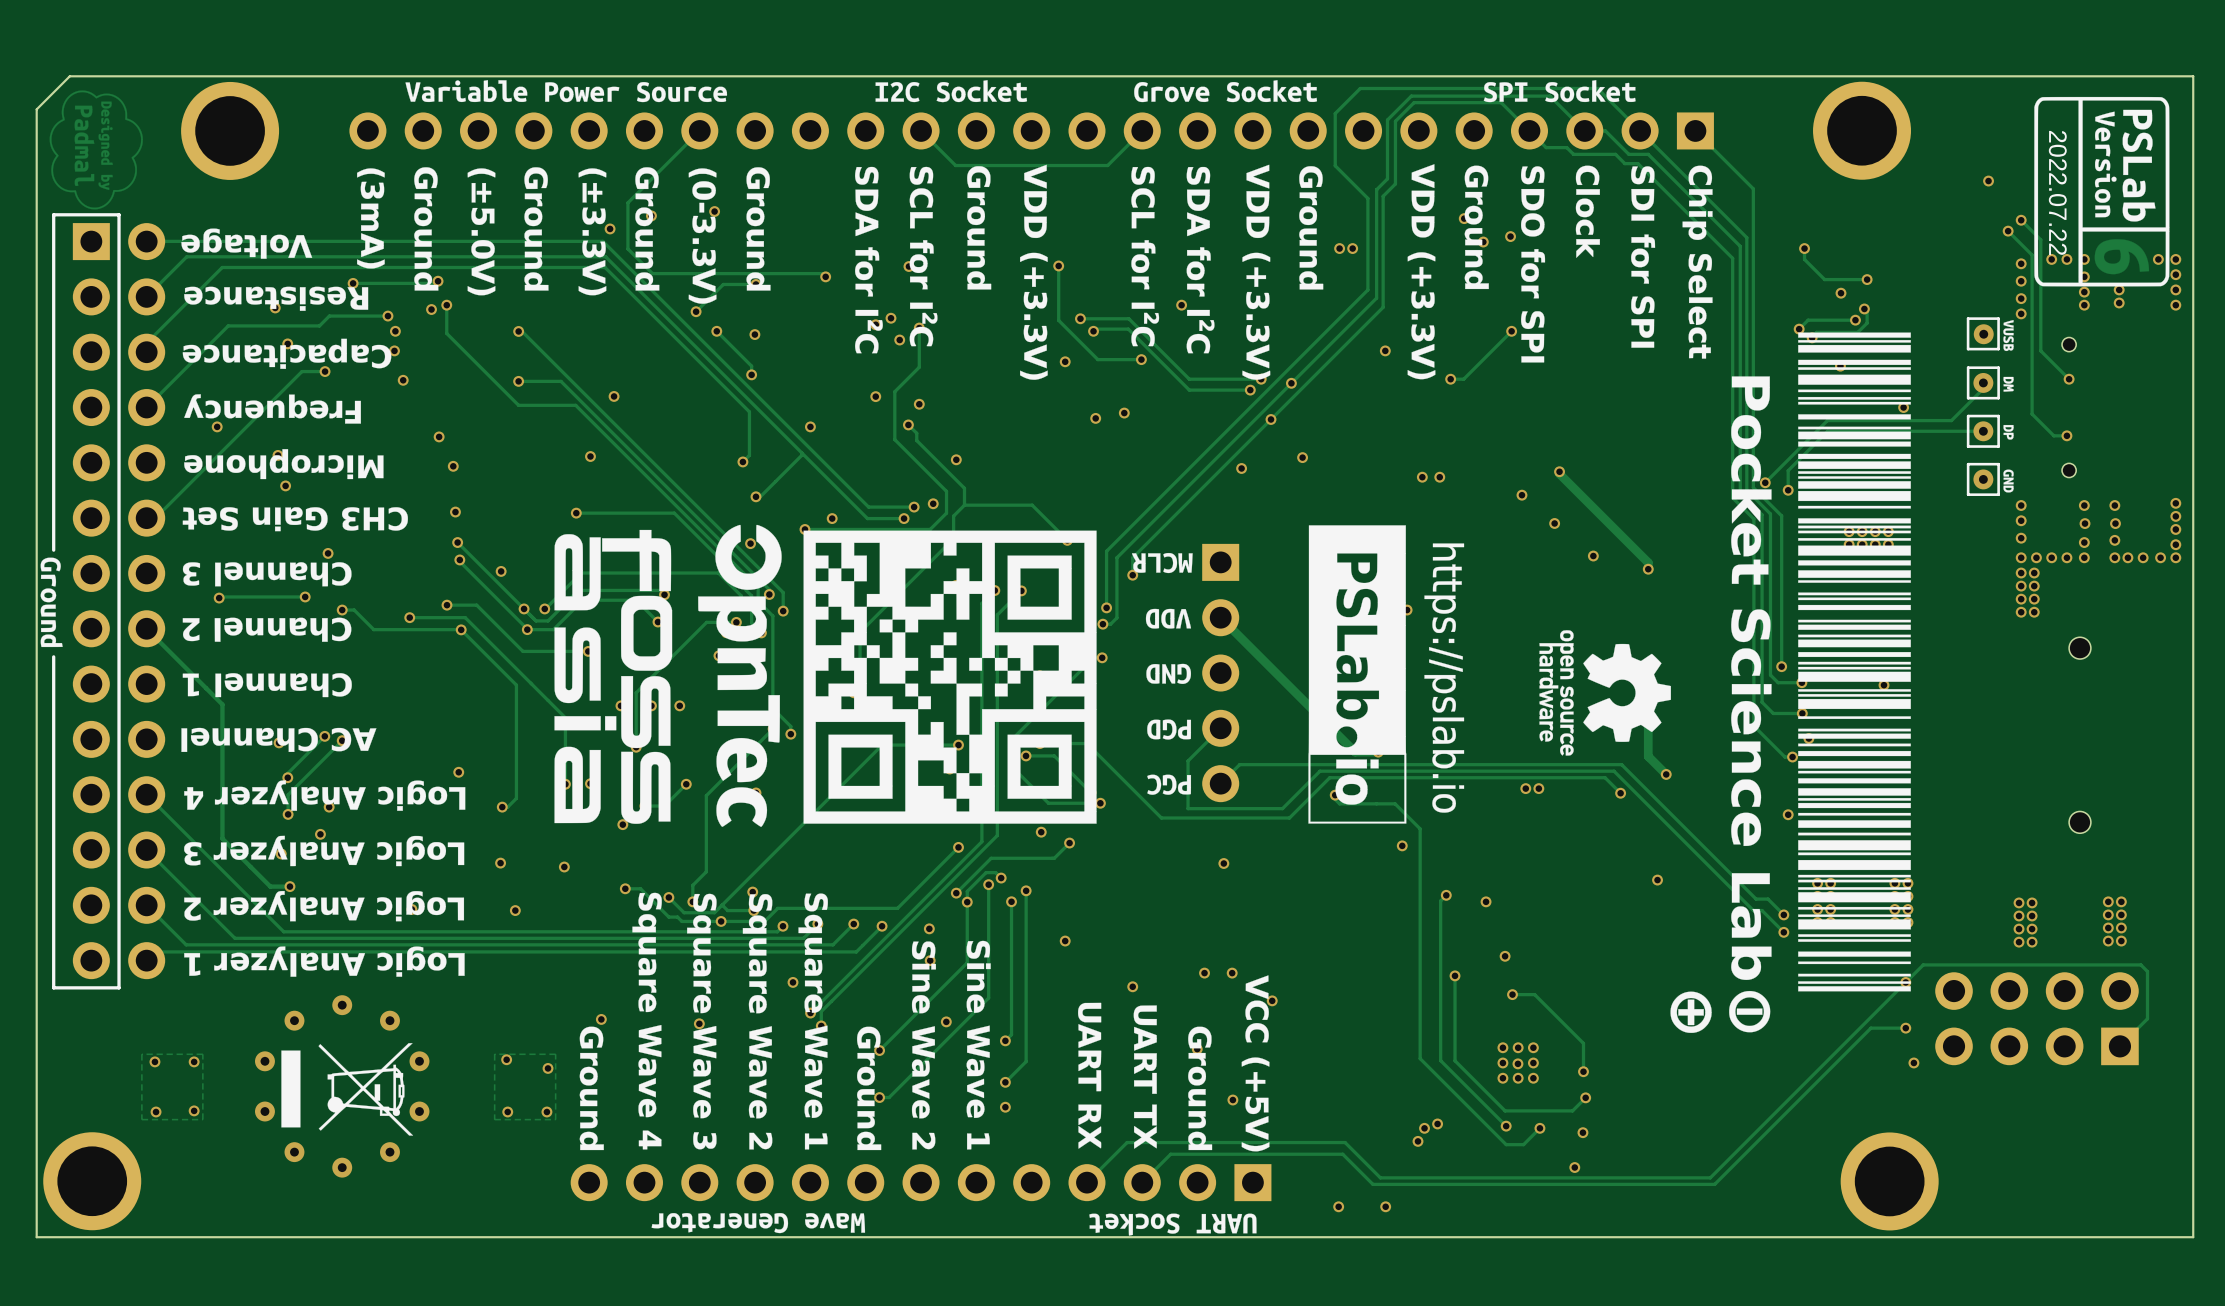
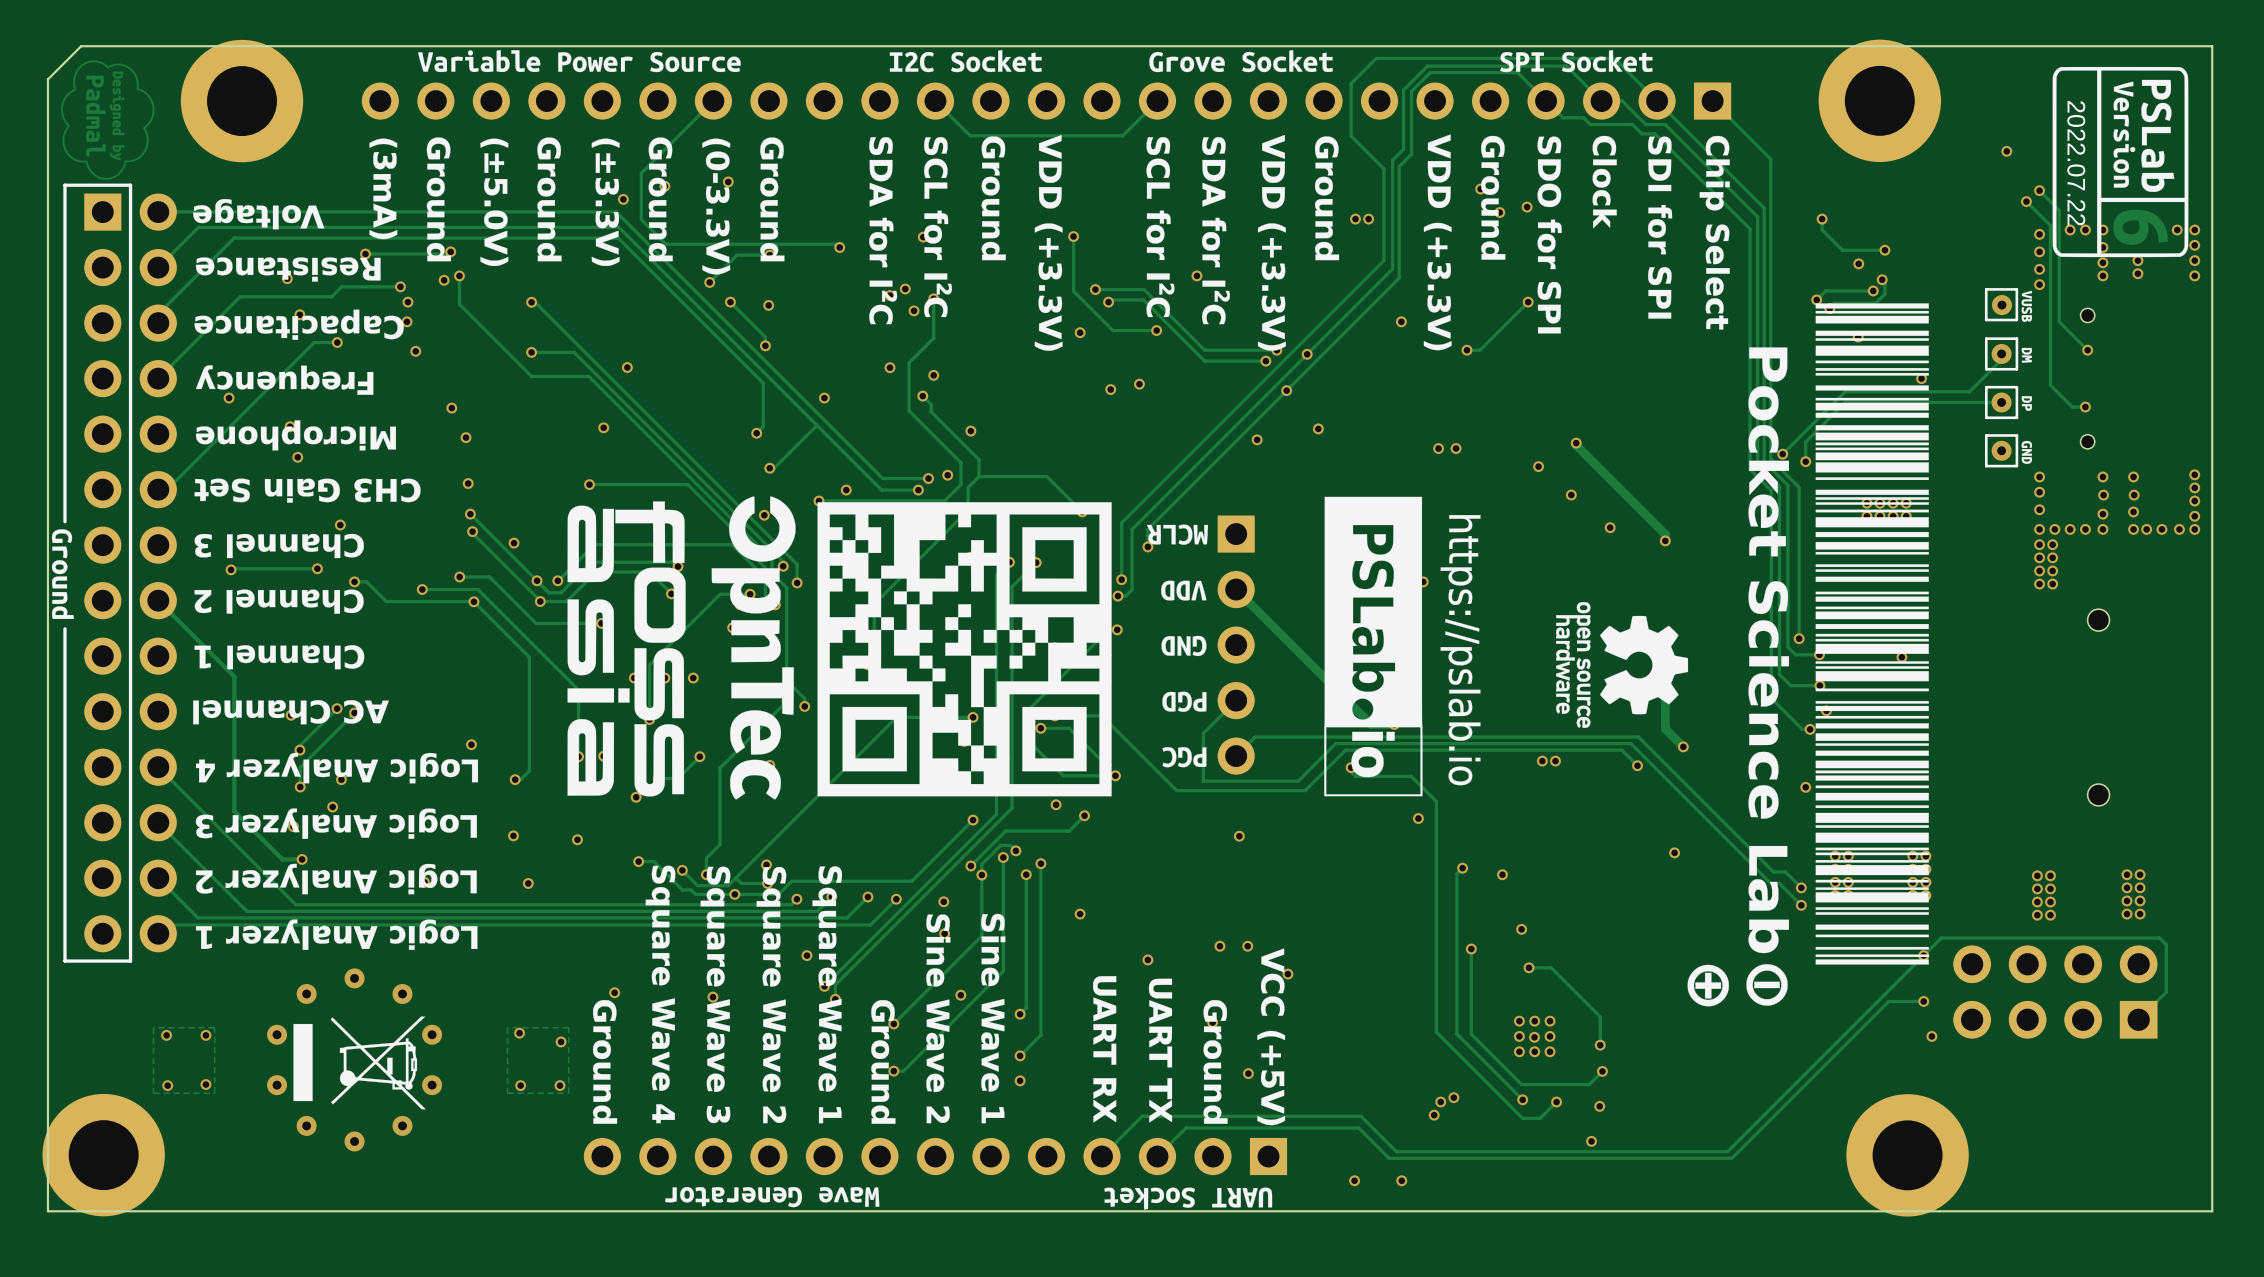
part footprint: [181, 81, 280, 180] -> [180, 39, 304, 163]
part footprint: [1813, 81, 1912, 180] -> [1818, 39, 1942, 163]
part footprint: [43, 1132, 142, 1231] -> [42, 1093, 165, 1217]
part footprint: [1840, 1132, 1939, 1231] -> [1846, 1094, 1969, 1217]

